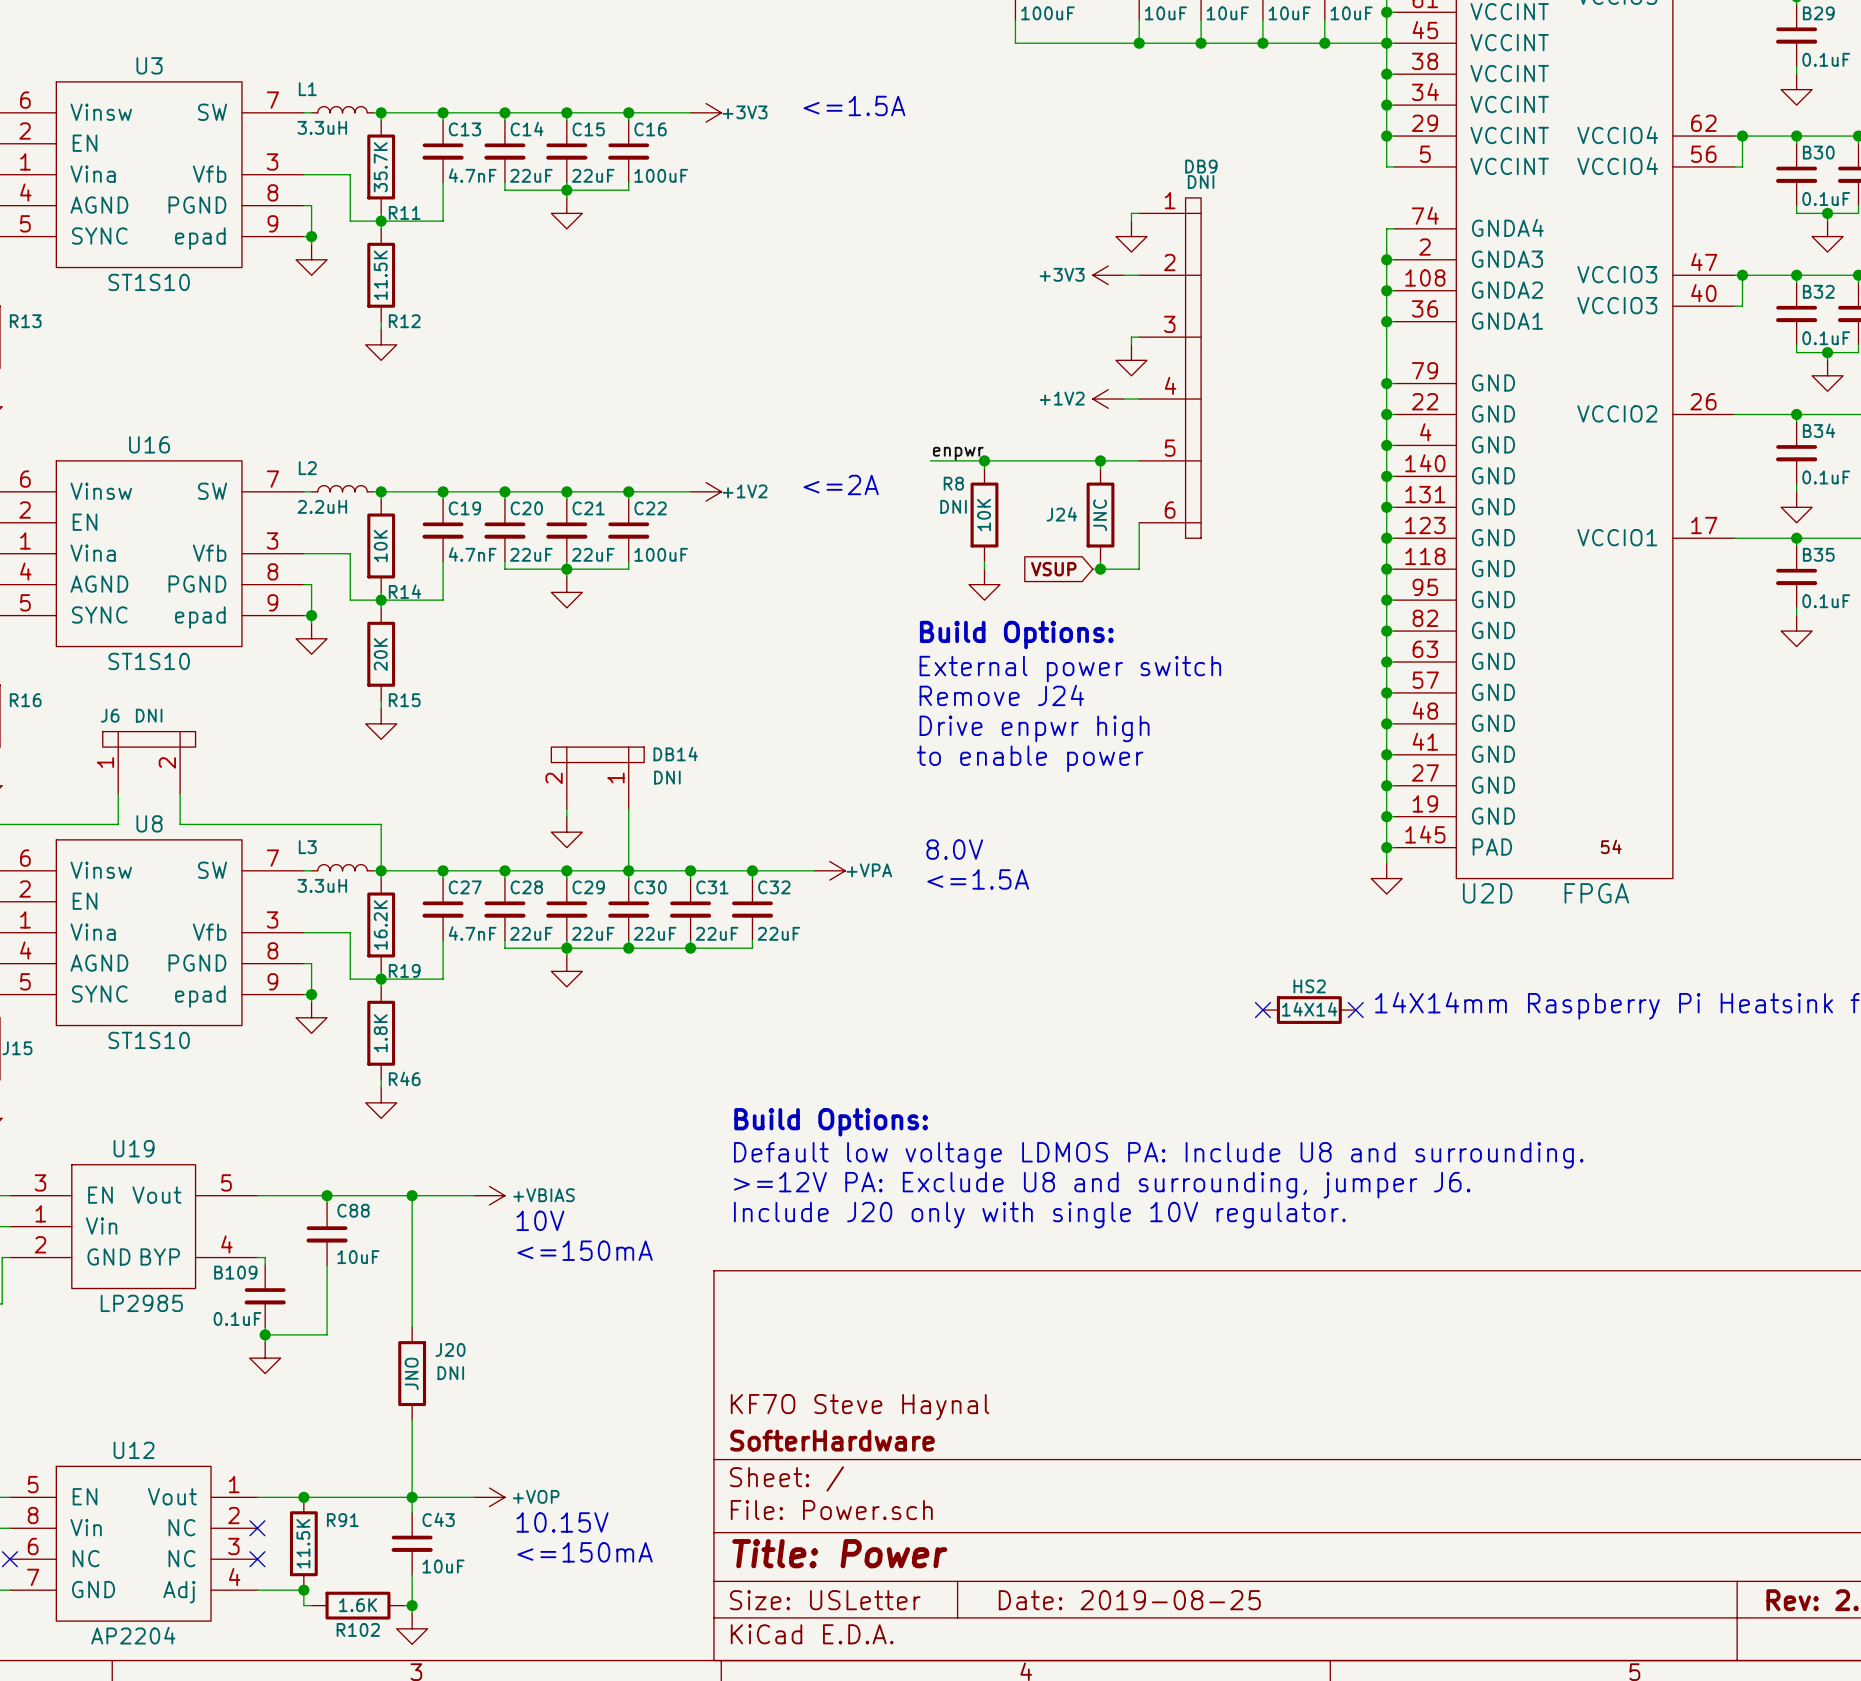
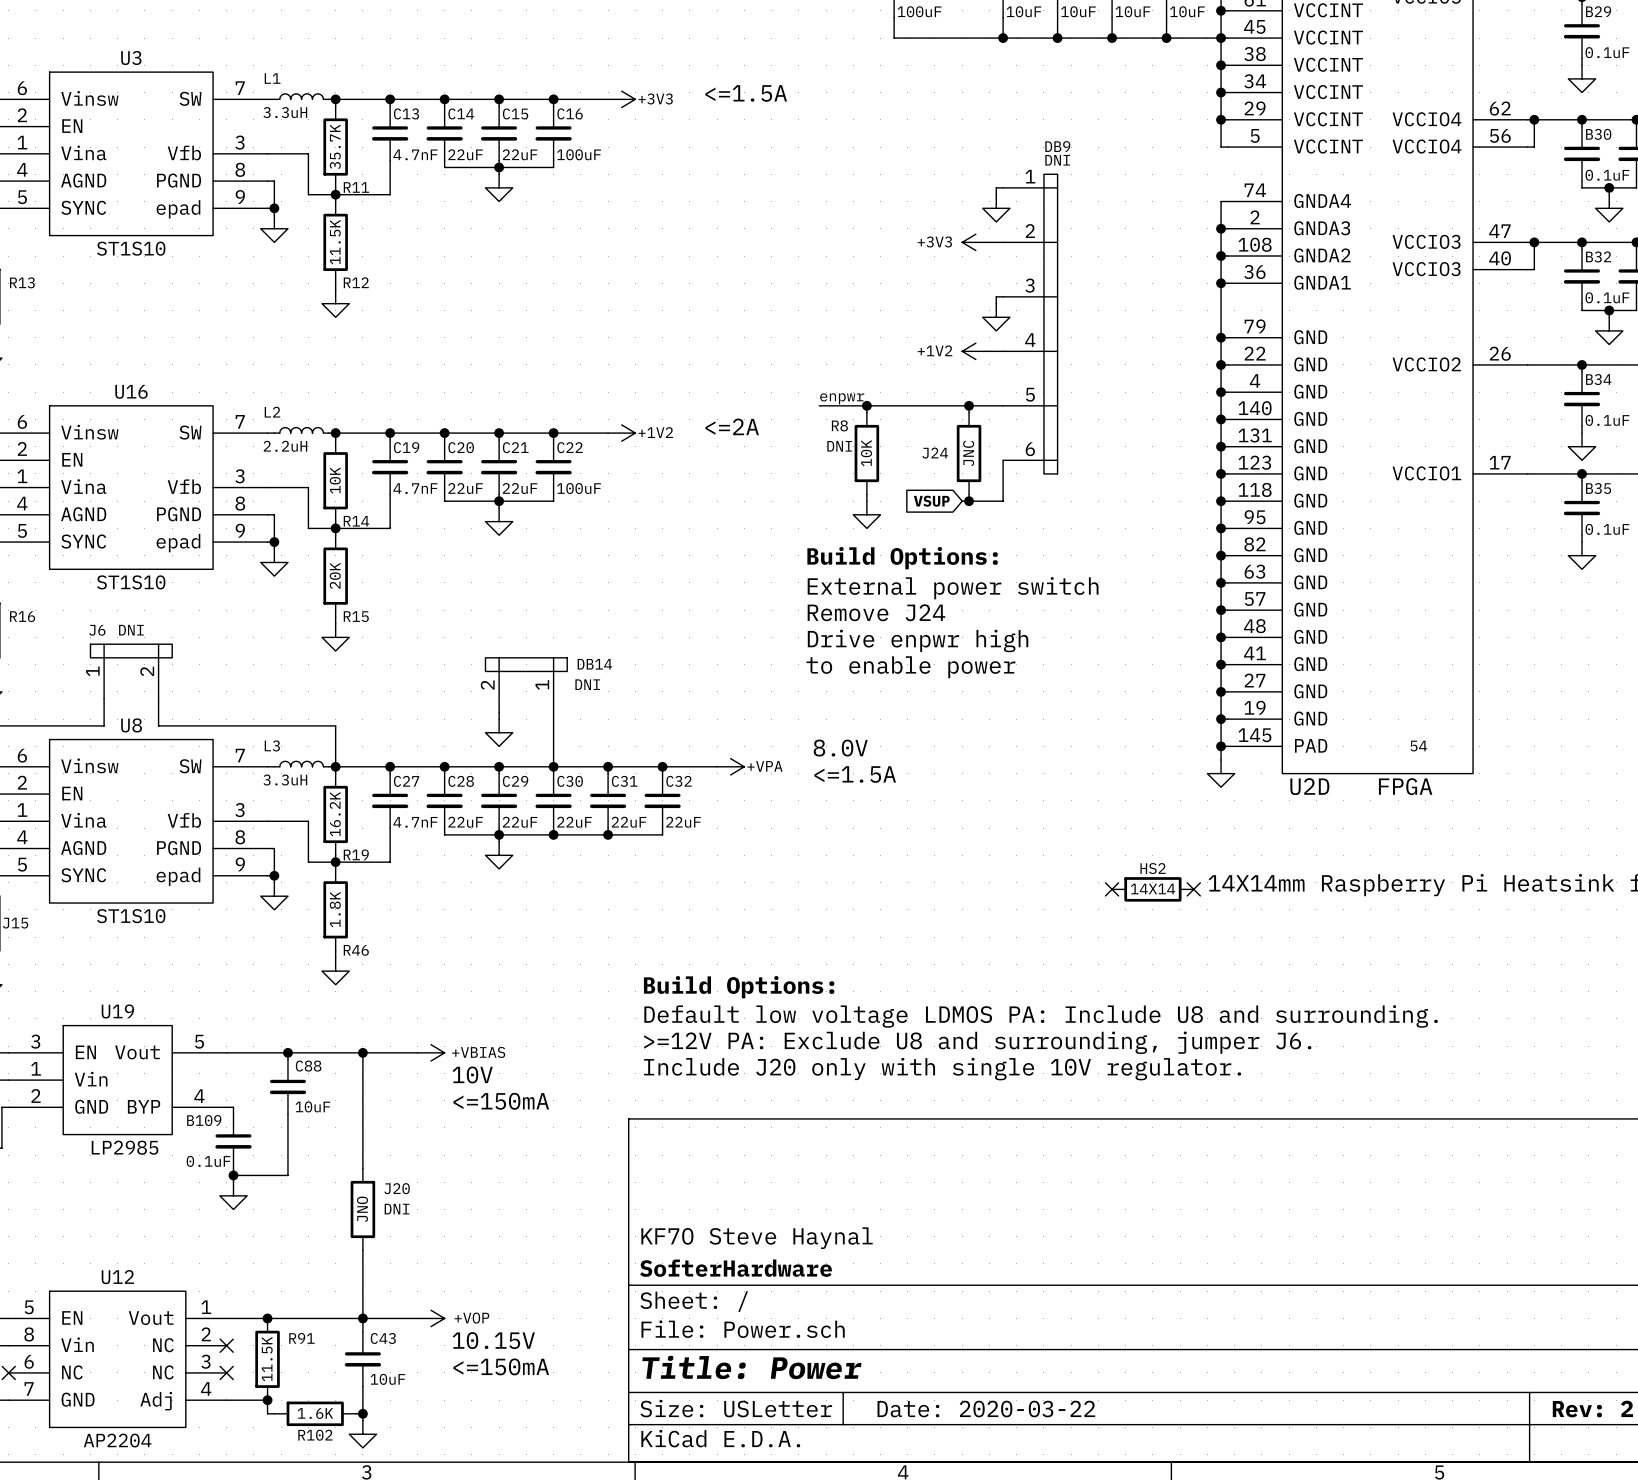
title block: Date: 2019-08-25 (1129, 1600) -> Date: 2020-03-22 (986, 1409)

